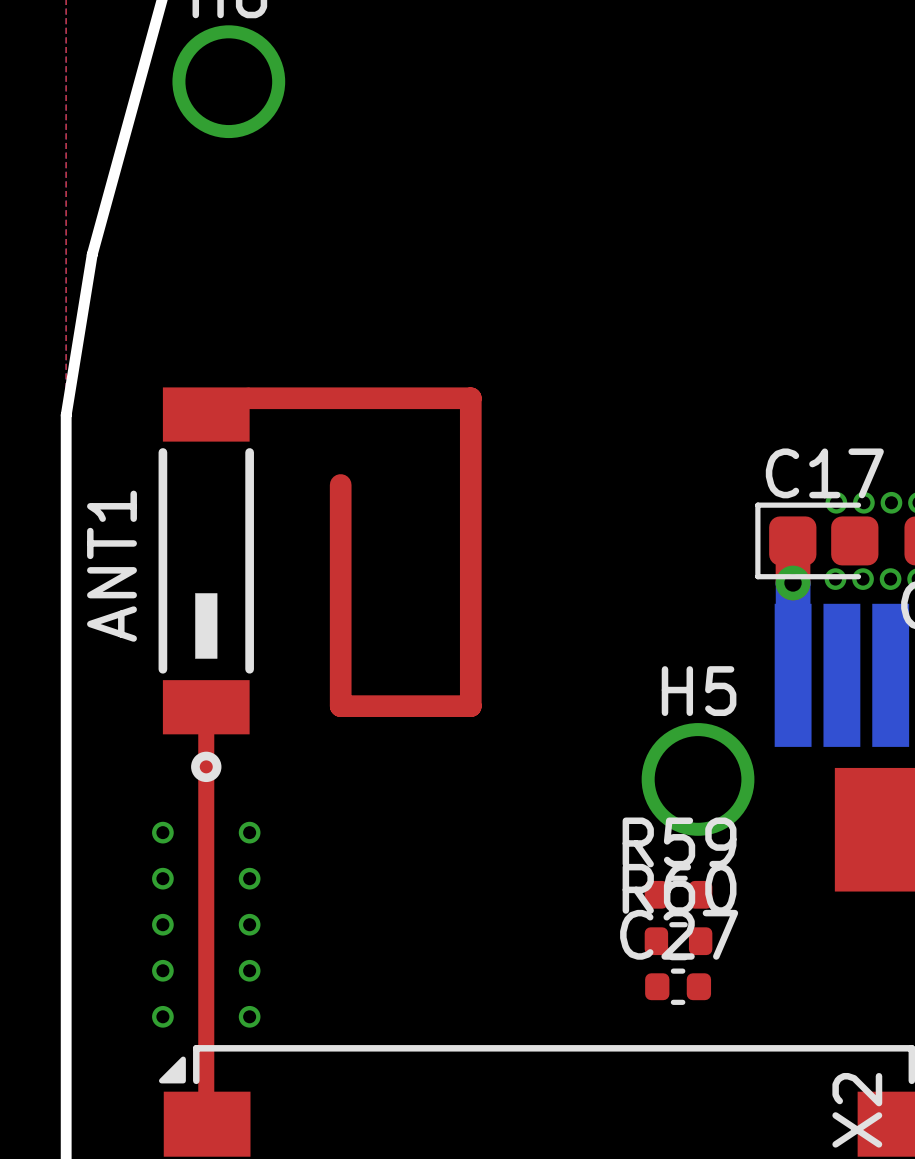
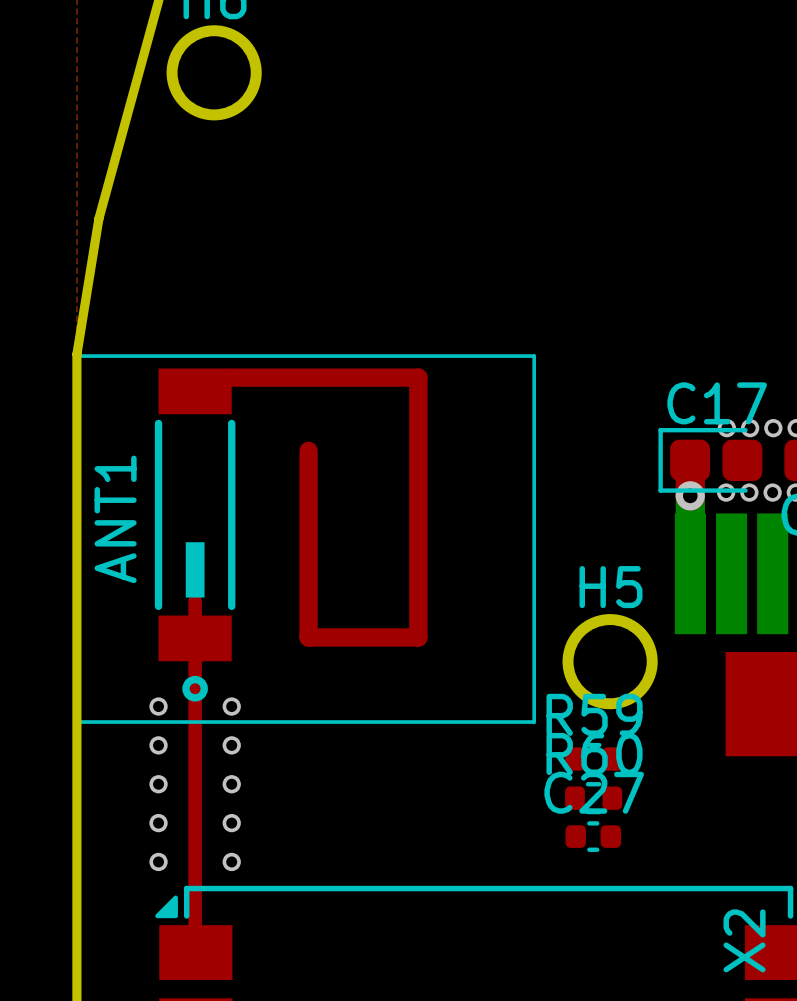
line: none -> (74, 356) (534, 356) (534, 722) (74, 722) (74, 356)
ANT1 position: (320, 584) -> (291, 535)

